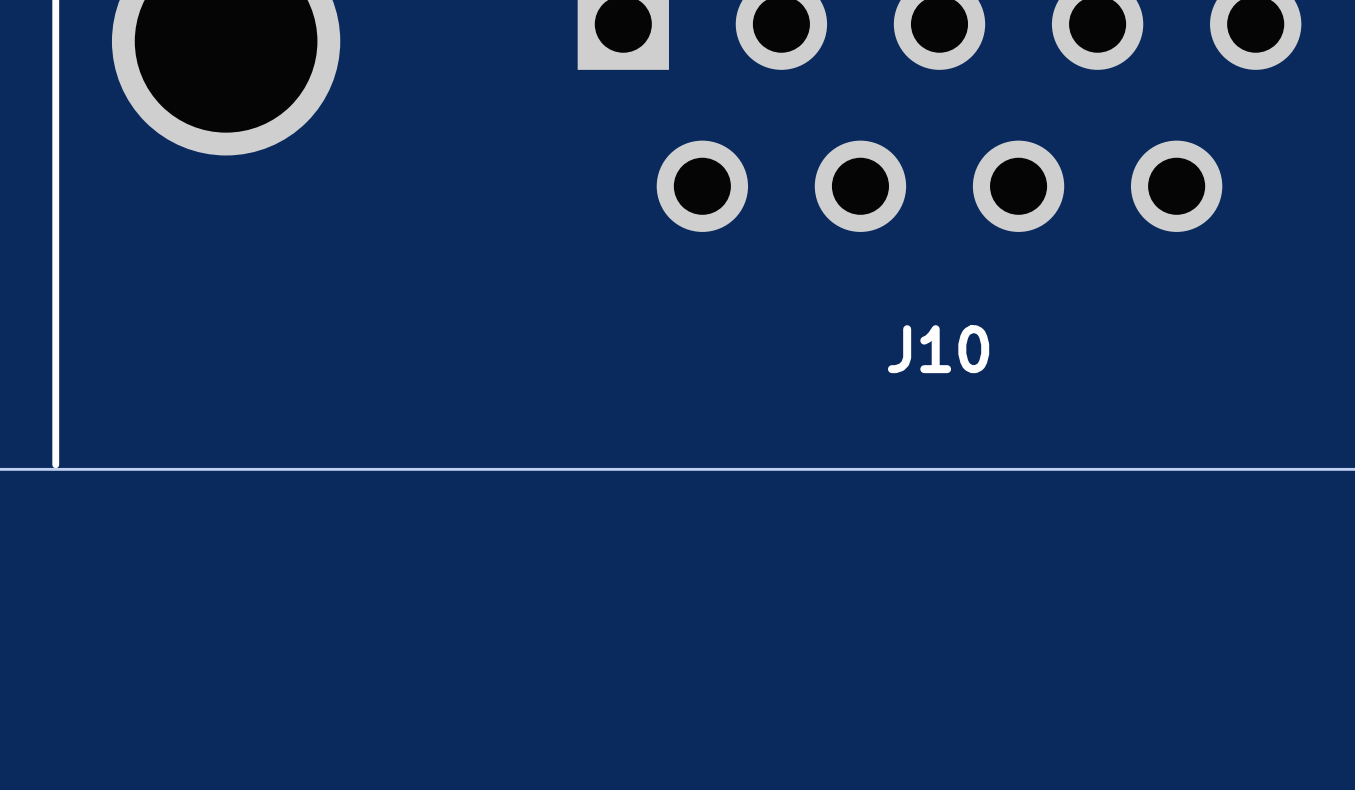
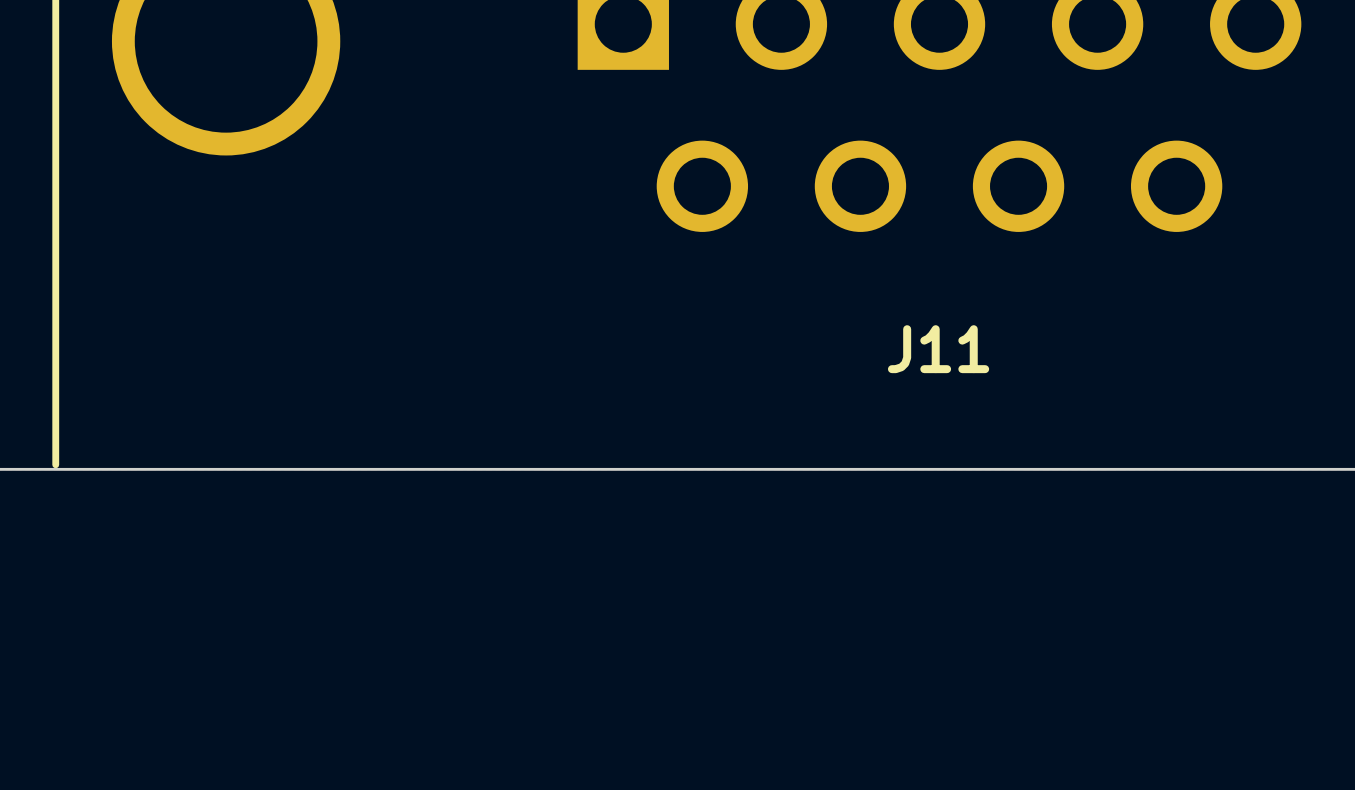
J10 name: J10 (938, 349) -> J11 (938, 349)

